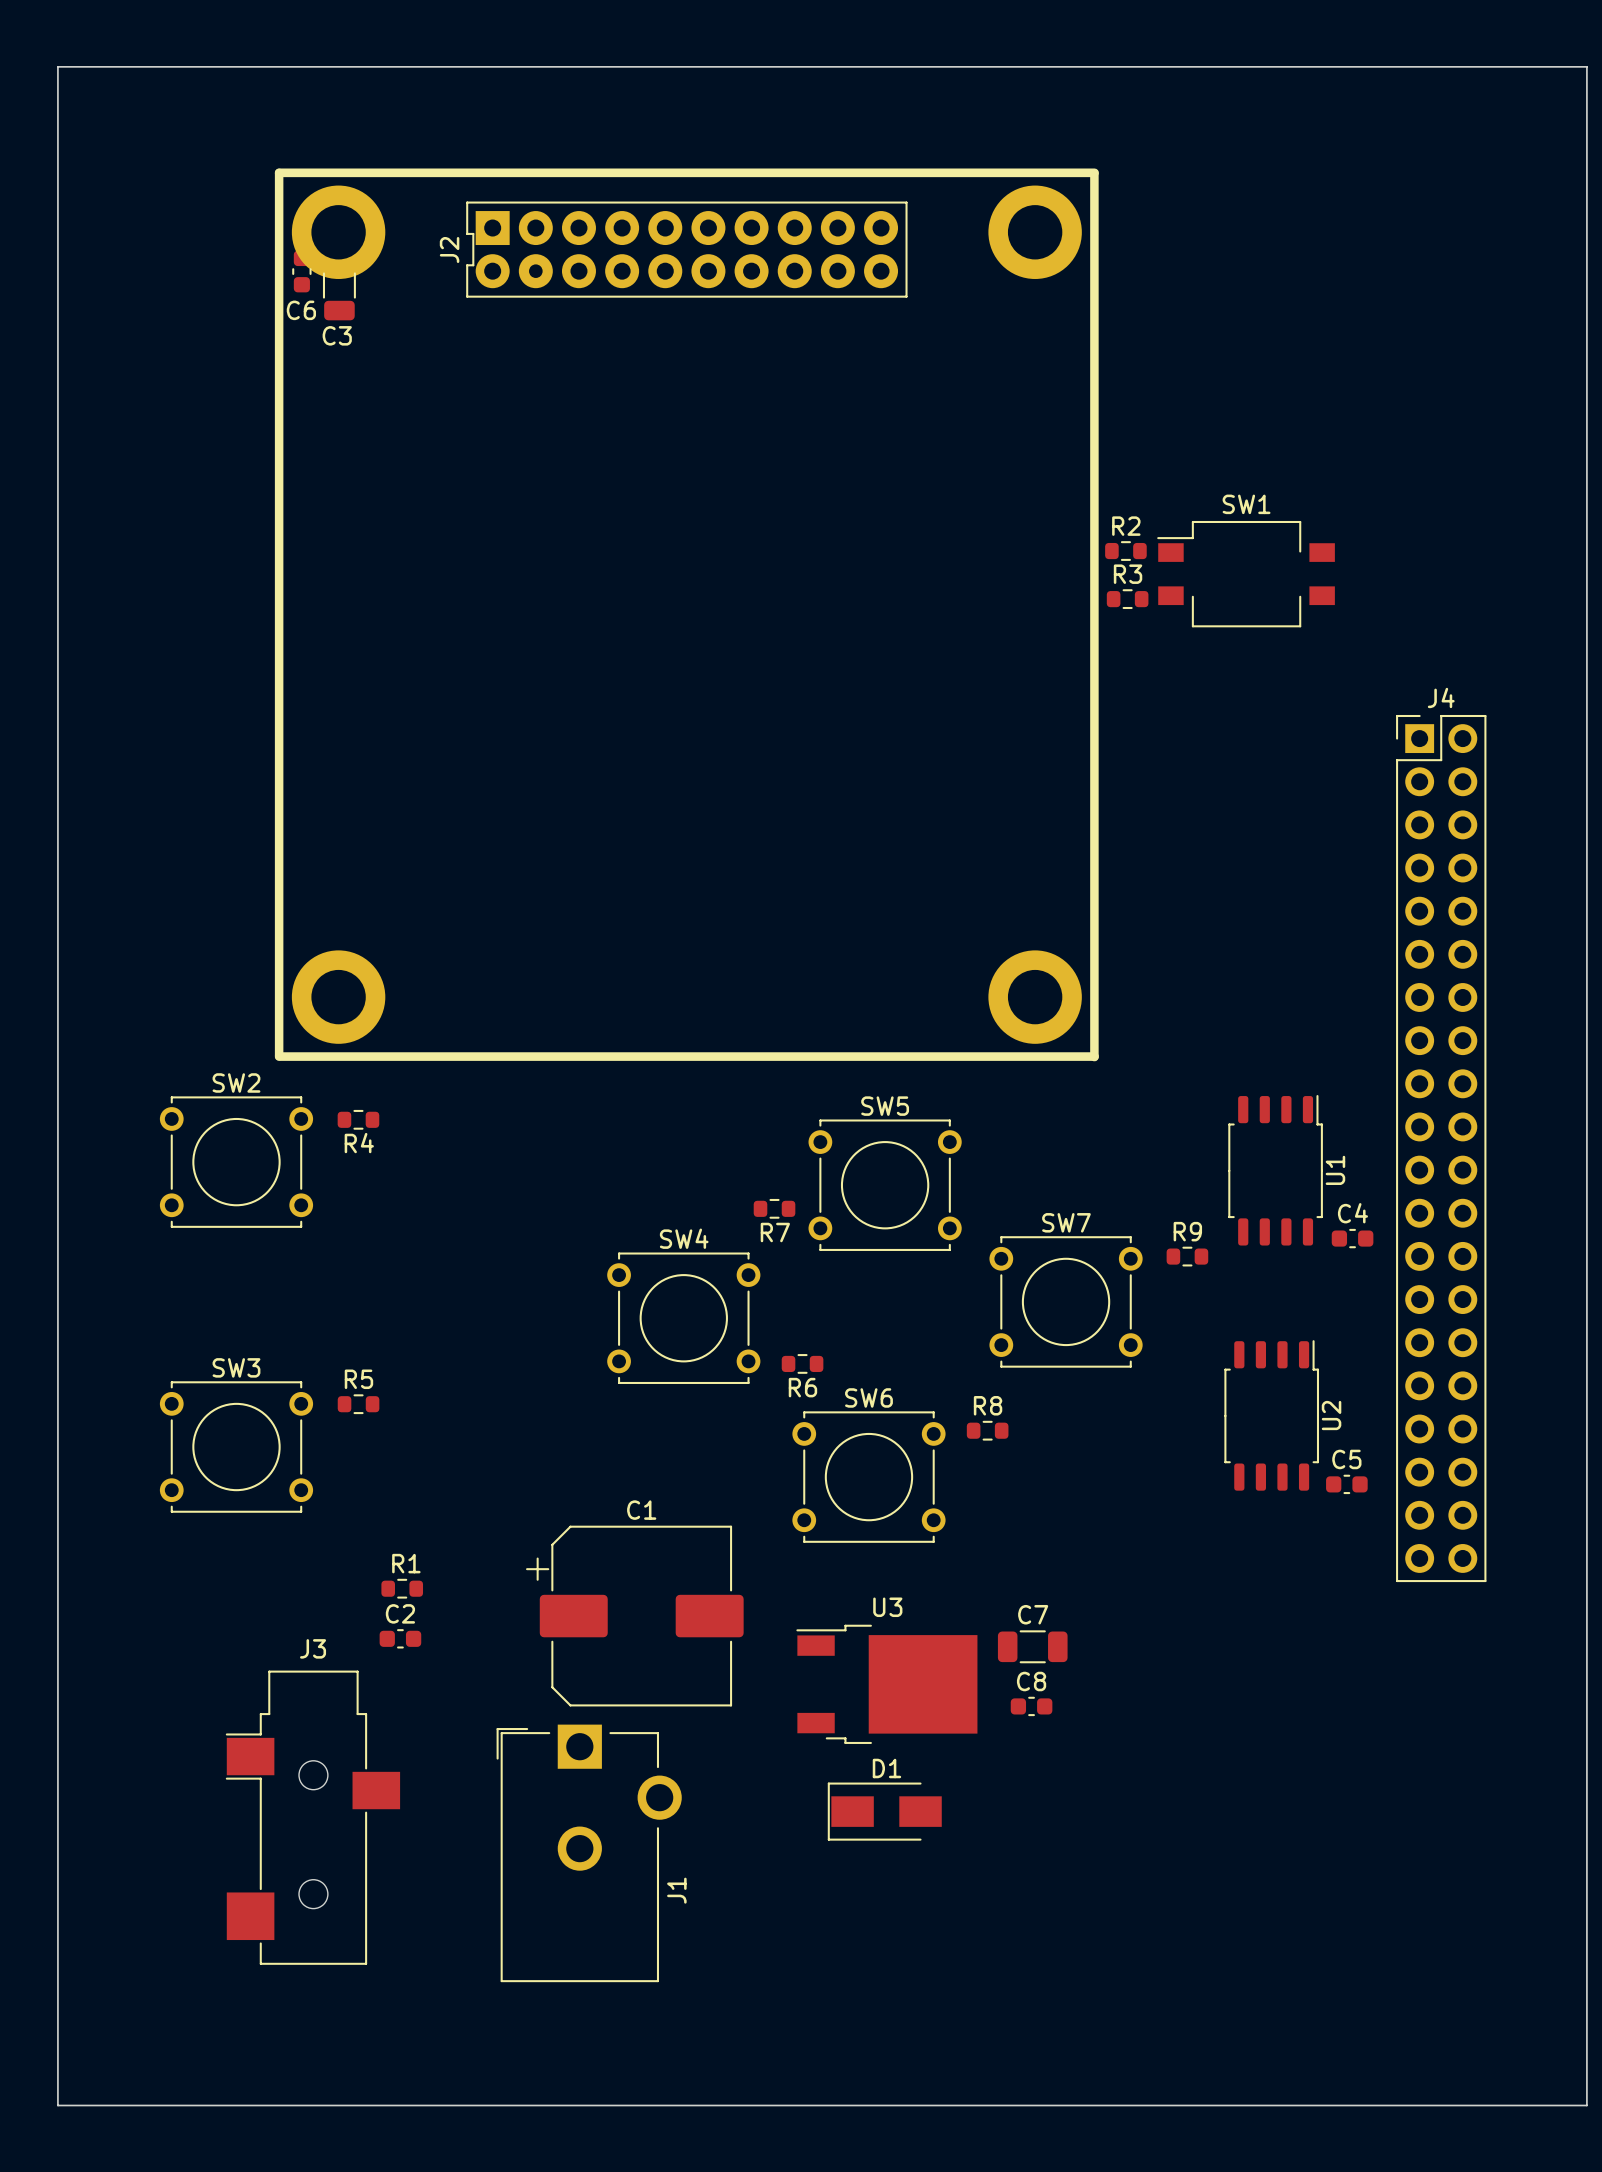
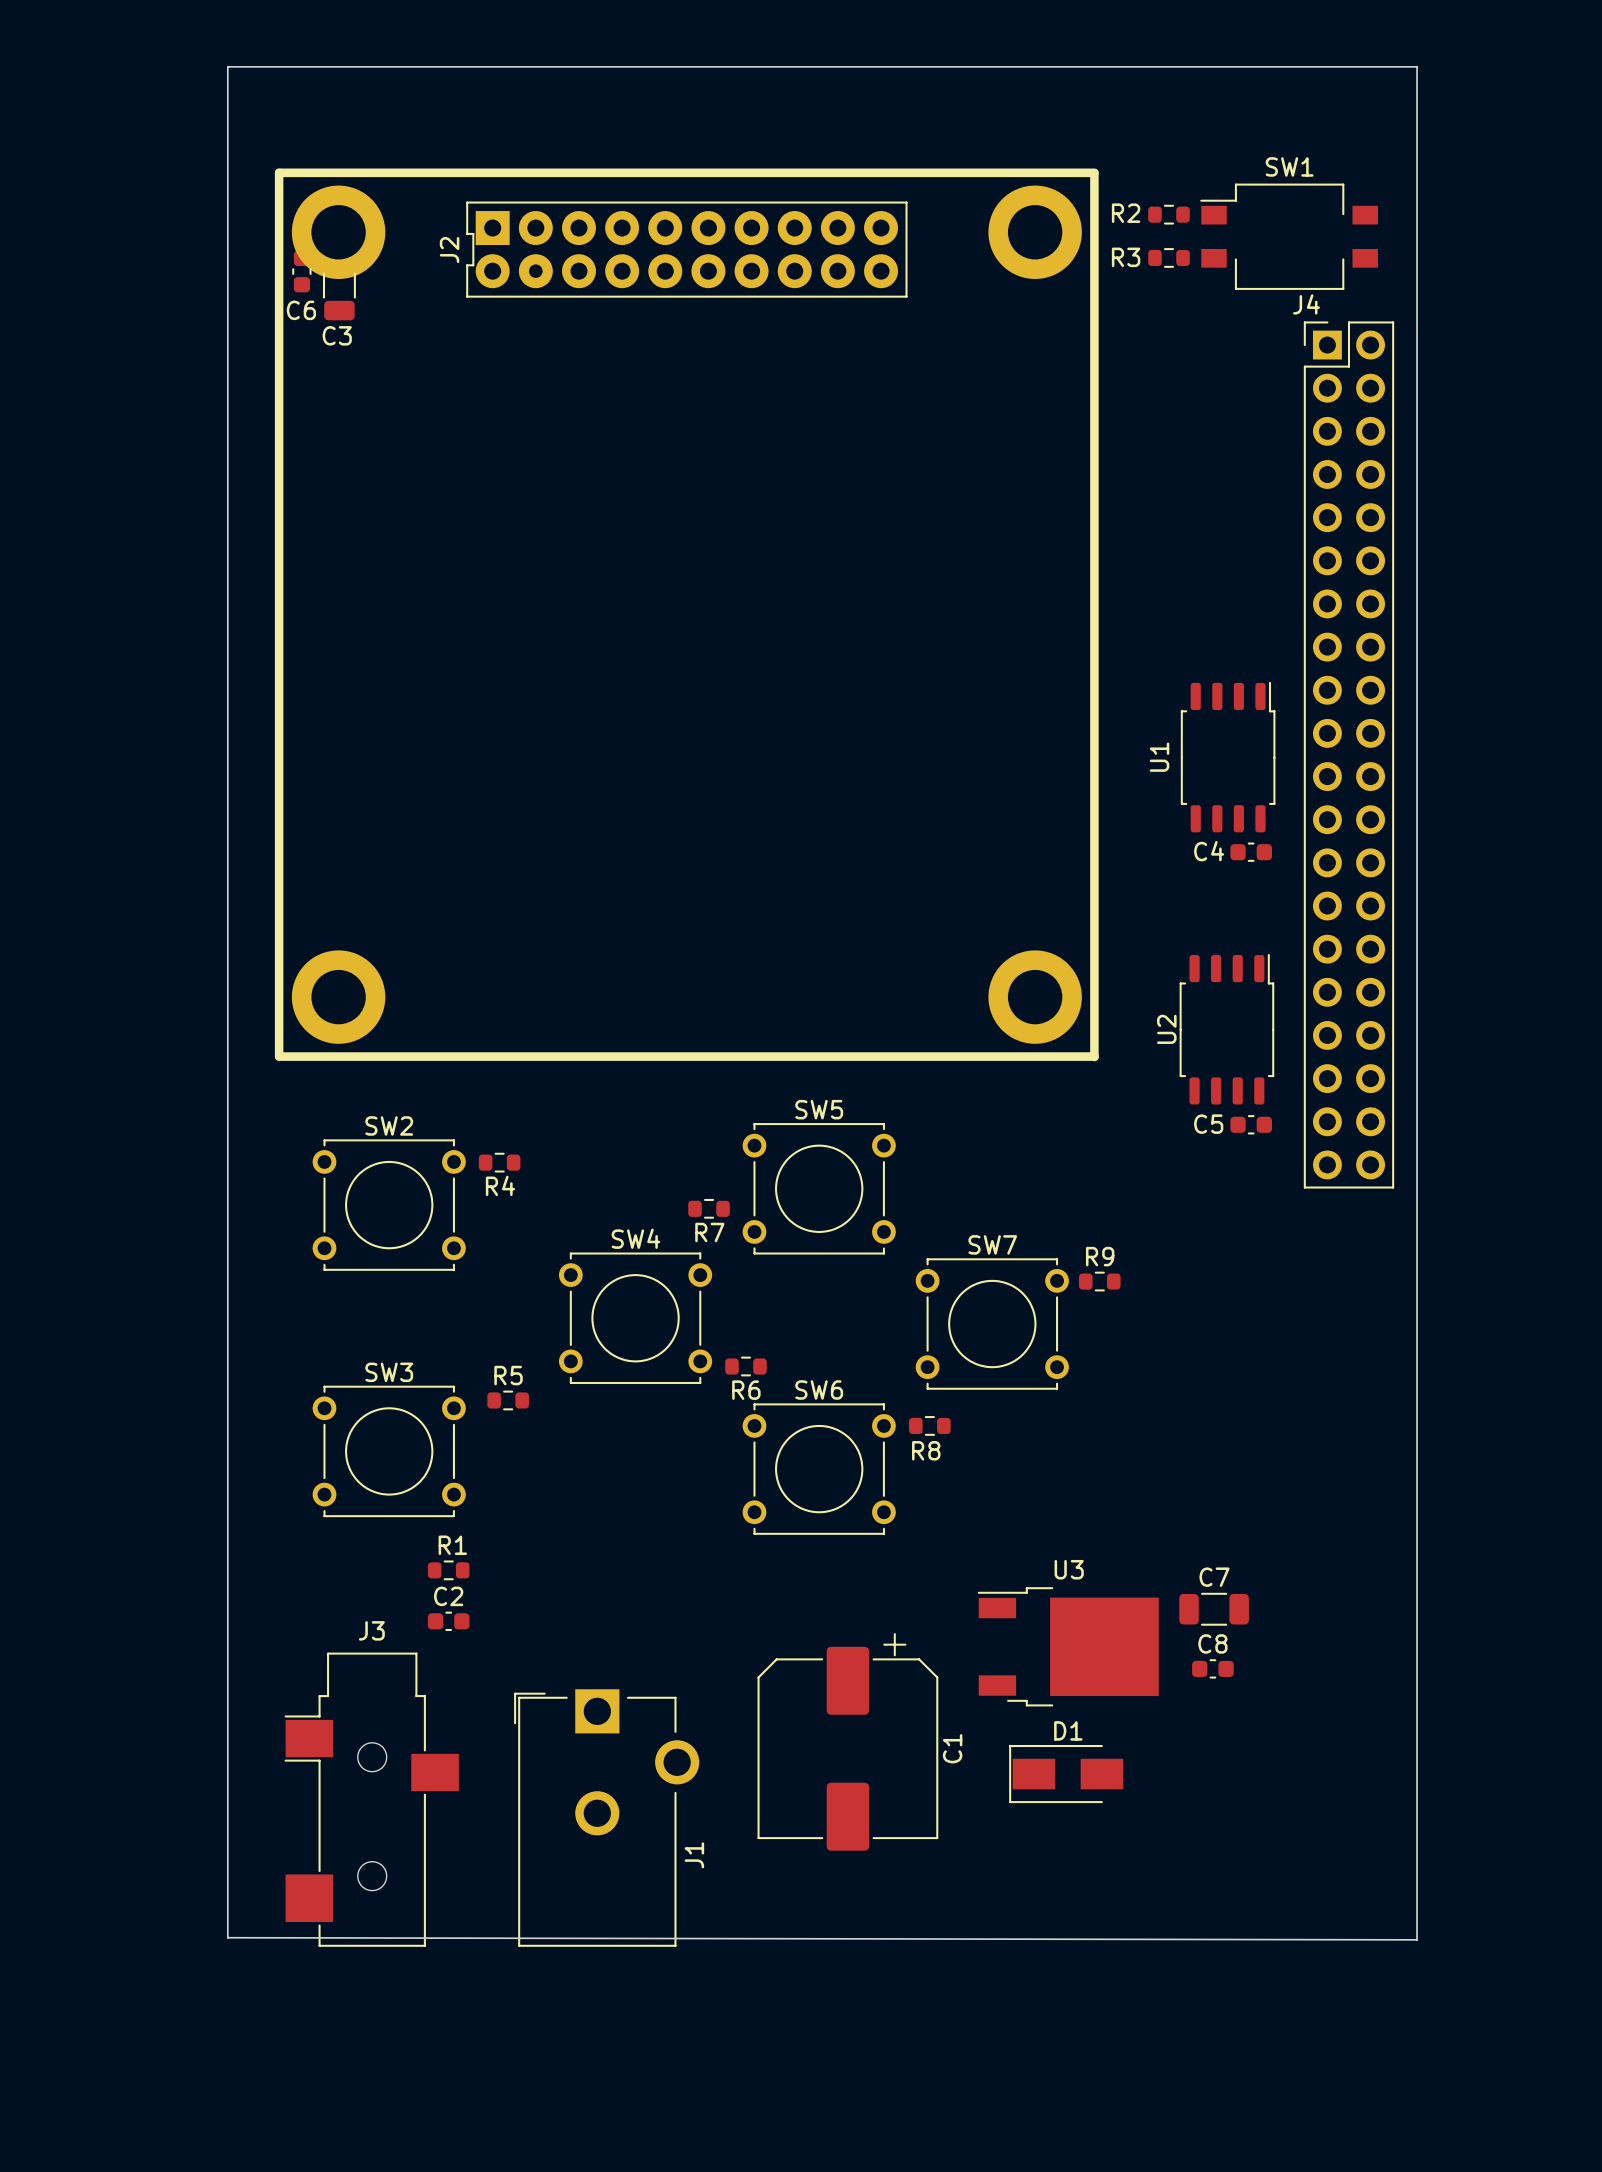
board edge: (227, 66) (57, 66) (57, 2105) (1586, 2105) (1586, 66) (1417, 66) -> (227, 66) (227, 1937) (1417, 1939) (1417, 66)
R2 name position: R2 (1126, 526) -> R2 (1126, 213)
R2 position: (1125, 551) -> (1168, 214)
R3 name position: R3 (1128, 574) -> R3 (1126, 257)
SW1 position: (1246, 574) -> (1289, 236)
R3 position: (1127, 599) -> (1168, 257)
J4 name position: J4 (1441, 697) -> J4 (1306, 304)
R4 position: (358, 1119) -> (499, 1162)
J4 position: (1441, 1148) -> (1348, 754)
SW2 position: (236, 1162) -> (389, 1205)
U1 position: (1275, 1170) -> (1228, 757)
U1 name position: U1 (1335, 1170) -> U1 (1159, 757)
SW5 position: (885, 1185) -> (819, 1188)
R7 position: (774, 1208) -> (709, 1208)
C4 name position: C4 (1352, 1213) -> C4 (1209, 851)
C4 position: (1352, 1238) -> (1251, 852)
R9 position: (1187, 1256) -> (1099, 1281)
SW7 position: (1066, 1301) -> (992, 1324)
SW4 position: (683, 1318) -> (635, 1318)
R6 position: (802, 1363) -> (745, 1366)
R5 position: (358, 1404) -> (508, 1400)
R8 name position: R8 (988, 1405) -> R8 (926, 1450)
U2 position: (1271, 1415) -> (1226, 1029)
U2 name position: U2 (1331, 1415) -> U2 (1166, 1029)
R8 position: (987, 1430) -> (929, 1425)
SW3 position: (236, 1447) -> (389, 1451)
C5 name position: C5 (1346, 1459) -> C5 (1208, 1124)
SW6 position: (868, 1477) -> (819, 1469)
C5 position: (1346, 1484) -> (1251, 1124)
R1 position: (402, 1588) -> (448, 1570)
C1 rotation: 0° (634, 1616) -> 90° clockwise (847, 1741)
C1 position: (634, 1616) -> (847, 1741)
C2 position: (400, 1638) -> (448, 1621)
C7 position: (1032, 1646) -> (1214, 1609)
U3 position: (886, 1684) -> (1068, 1646)
C8 position: (1031, 1706) -> (1212, 1668)
D1 position: (884, 1811) -> (1066, 1774)
J3 position: (312, 1817) -> (371, 1799)
J1 position: (589, 1853) -> (606, 1818)

